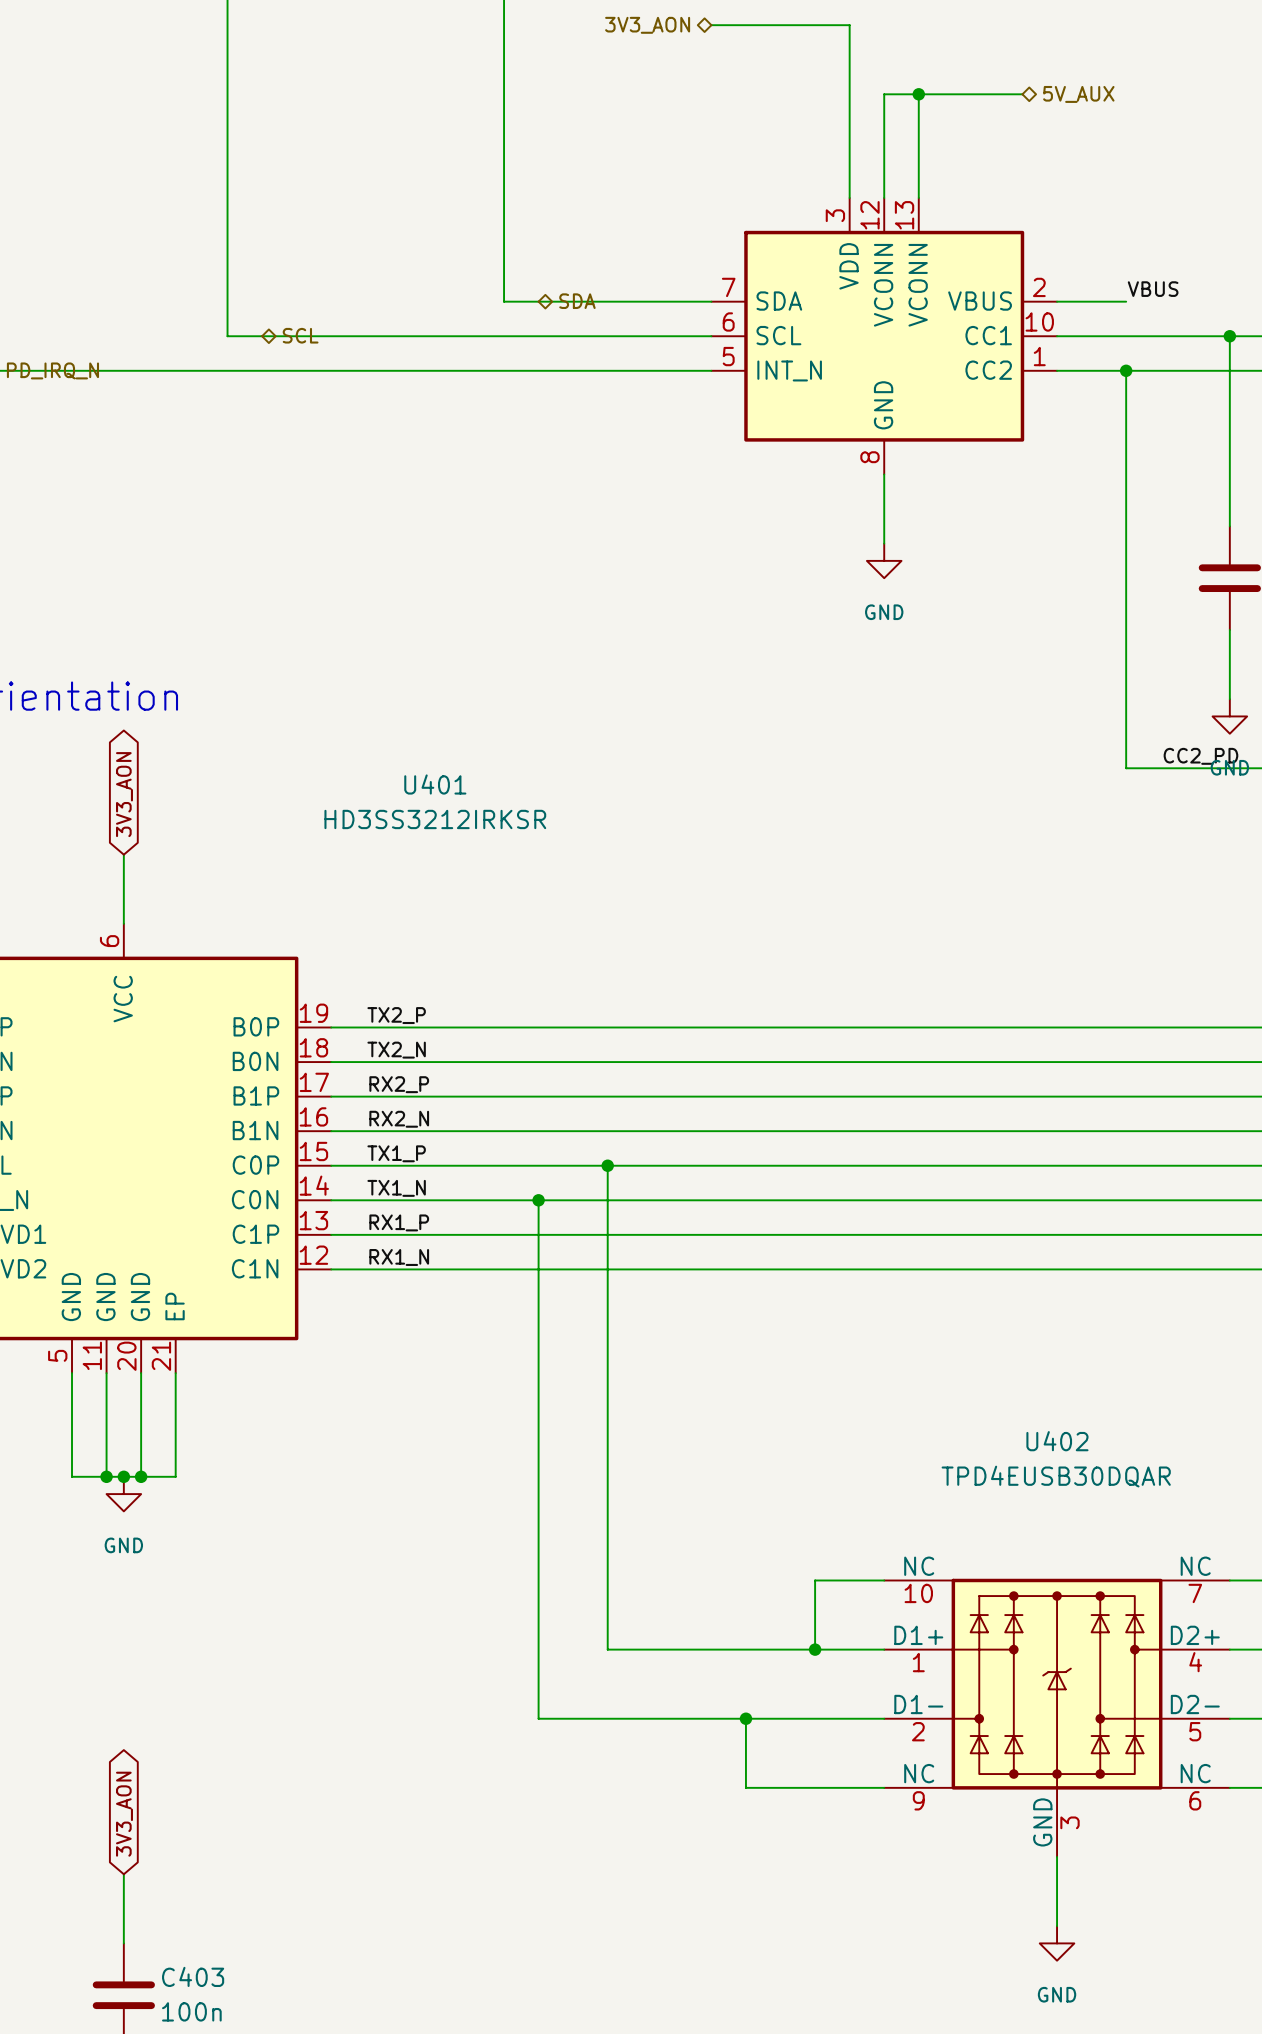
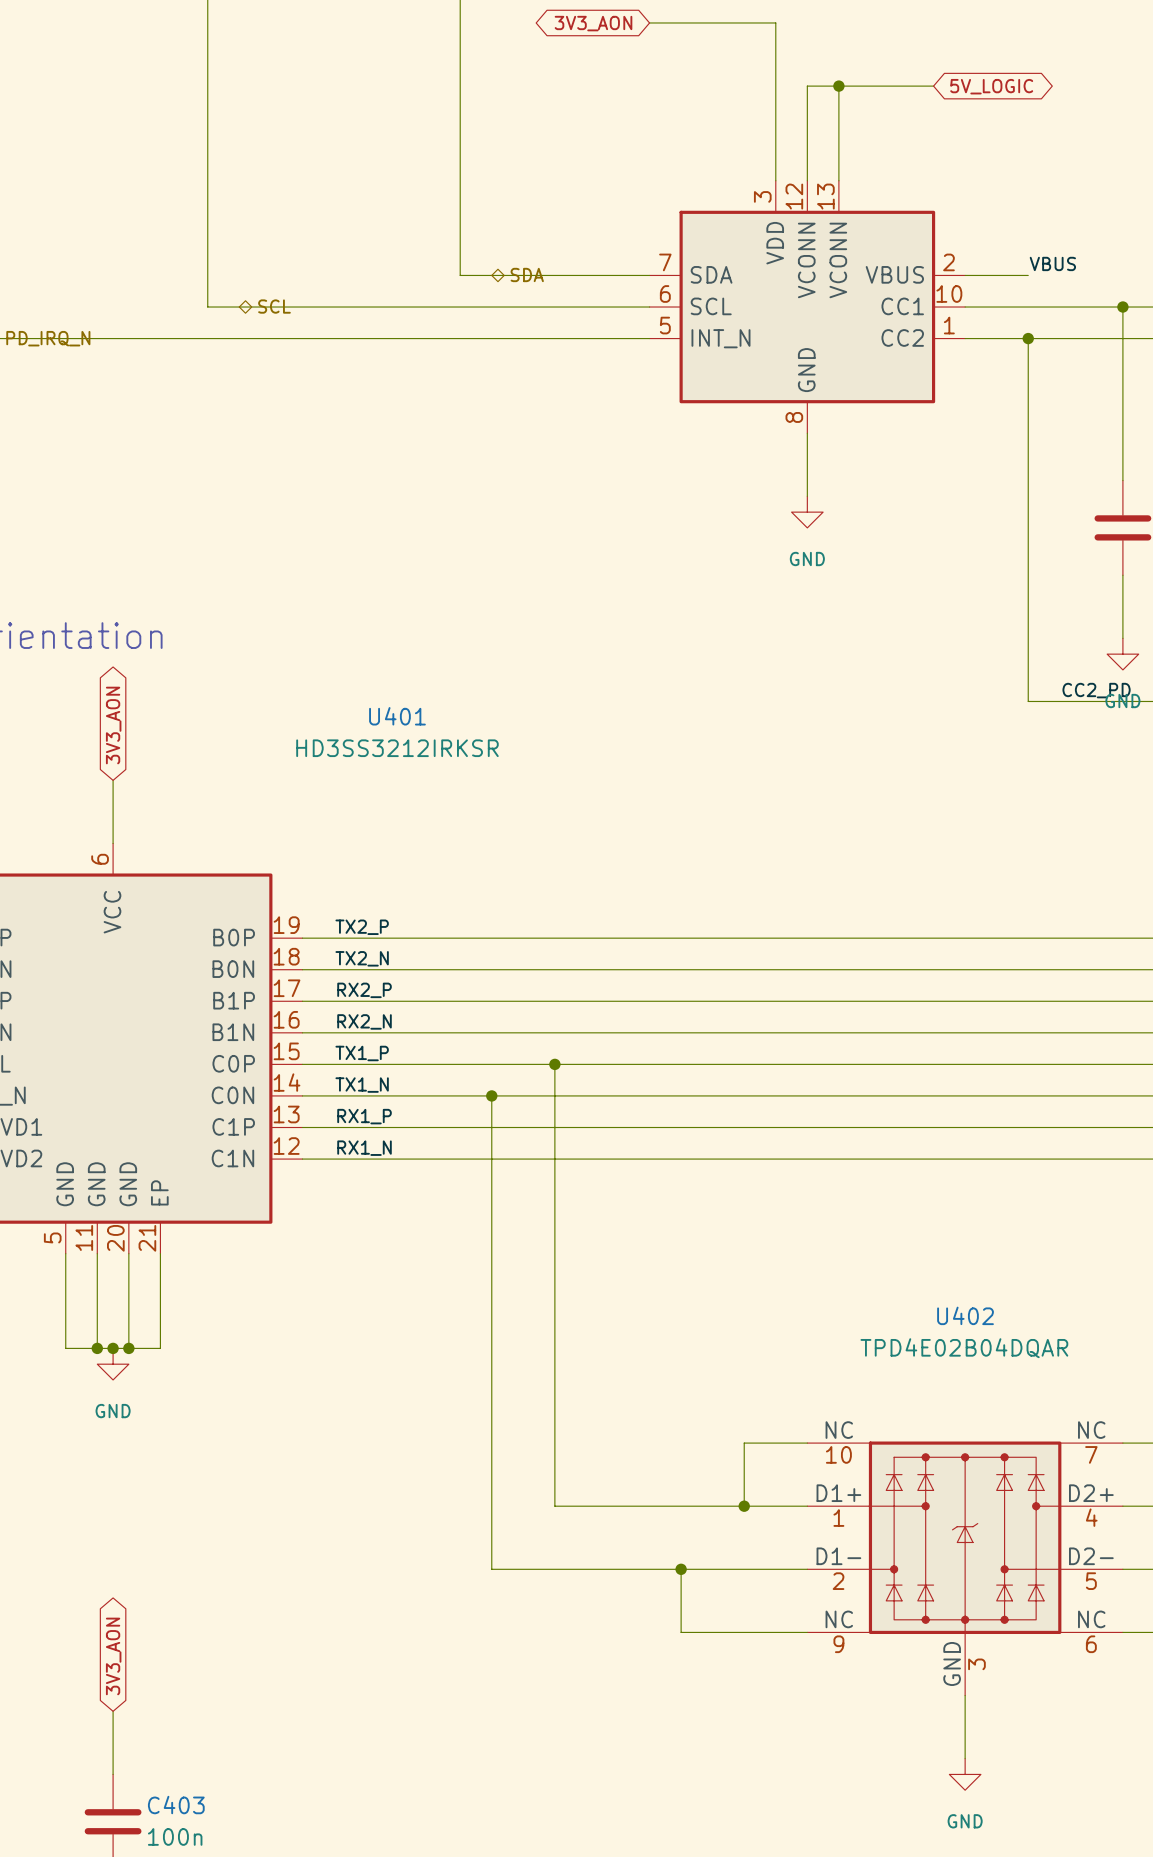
hierarchical label: 3V3_AON (647, 25) -> none
global label: none -> 3V3_AON (593, 23)
hierarchical label: 5V_AUX (1078, 94) -> none
global label: none -> 5V_LOGIC (991, 86)
U402 value: TPD4EUSB30DQAR (1056, 1476) -> TPD4E02B04DQAR (964, 1348)

